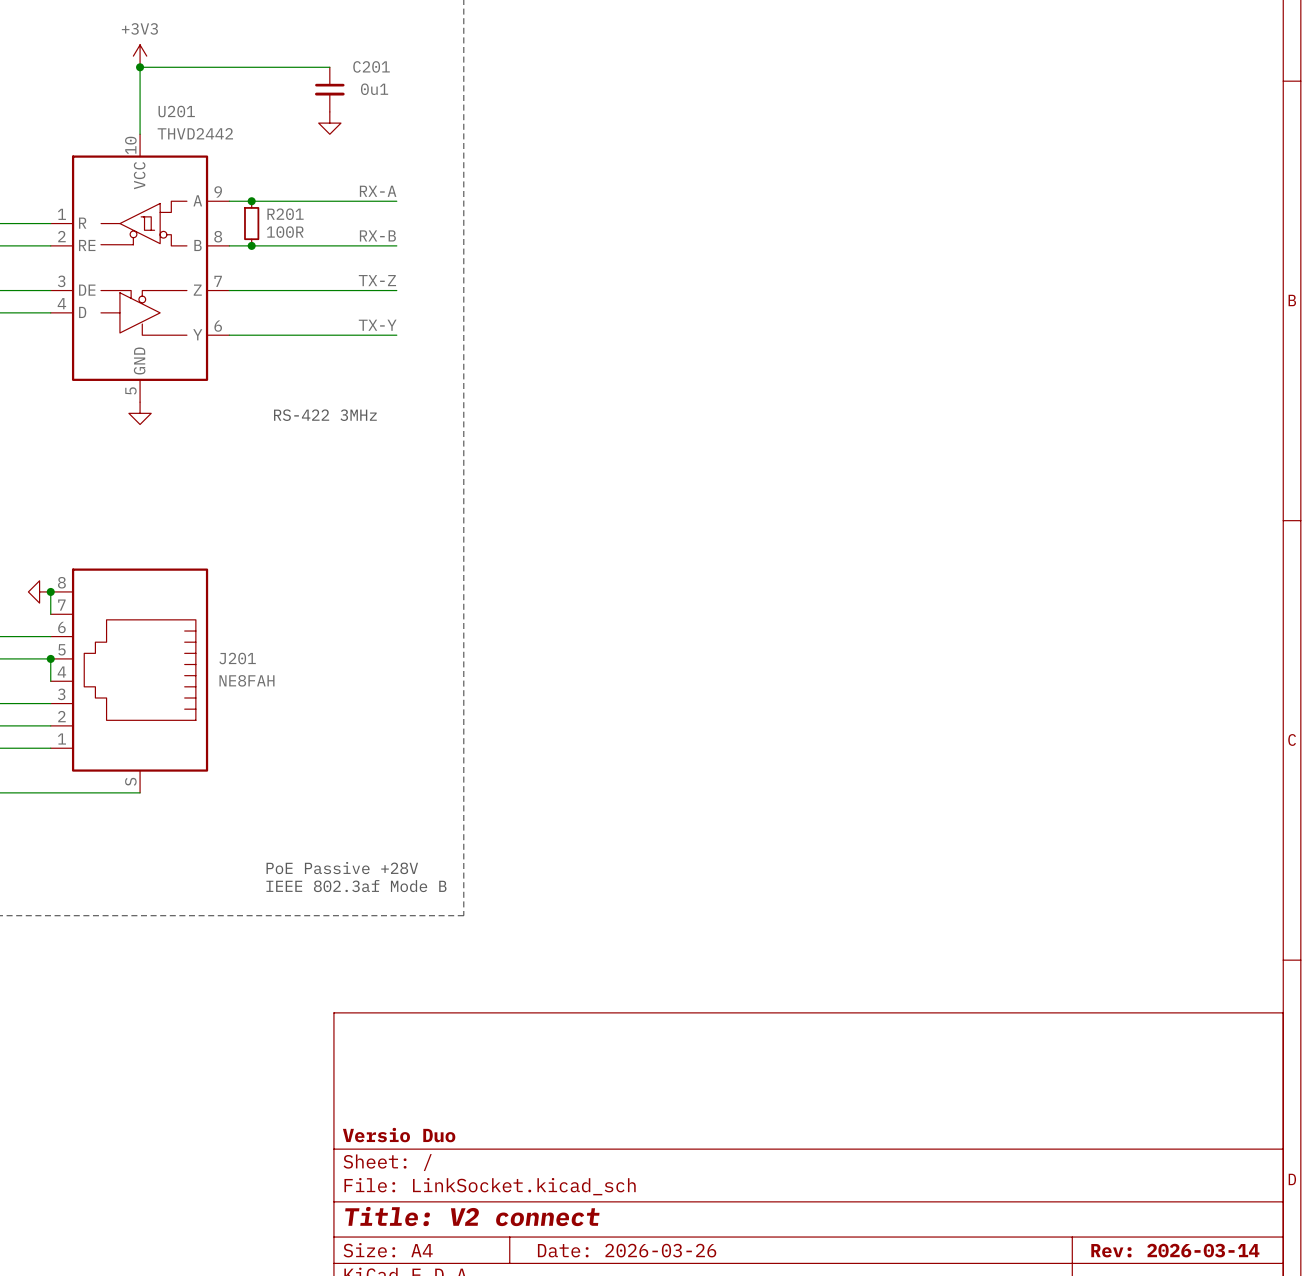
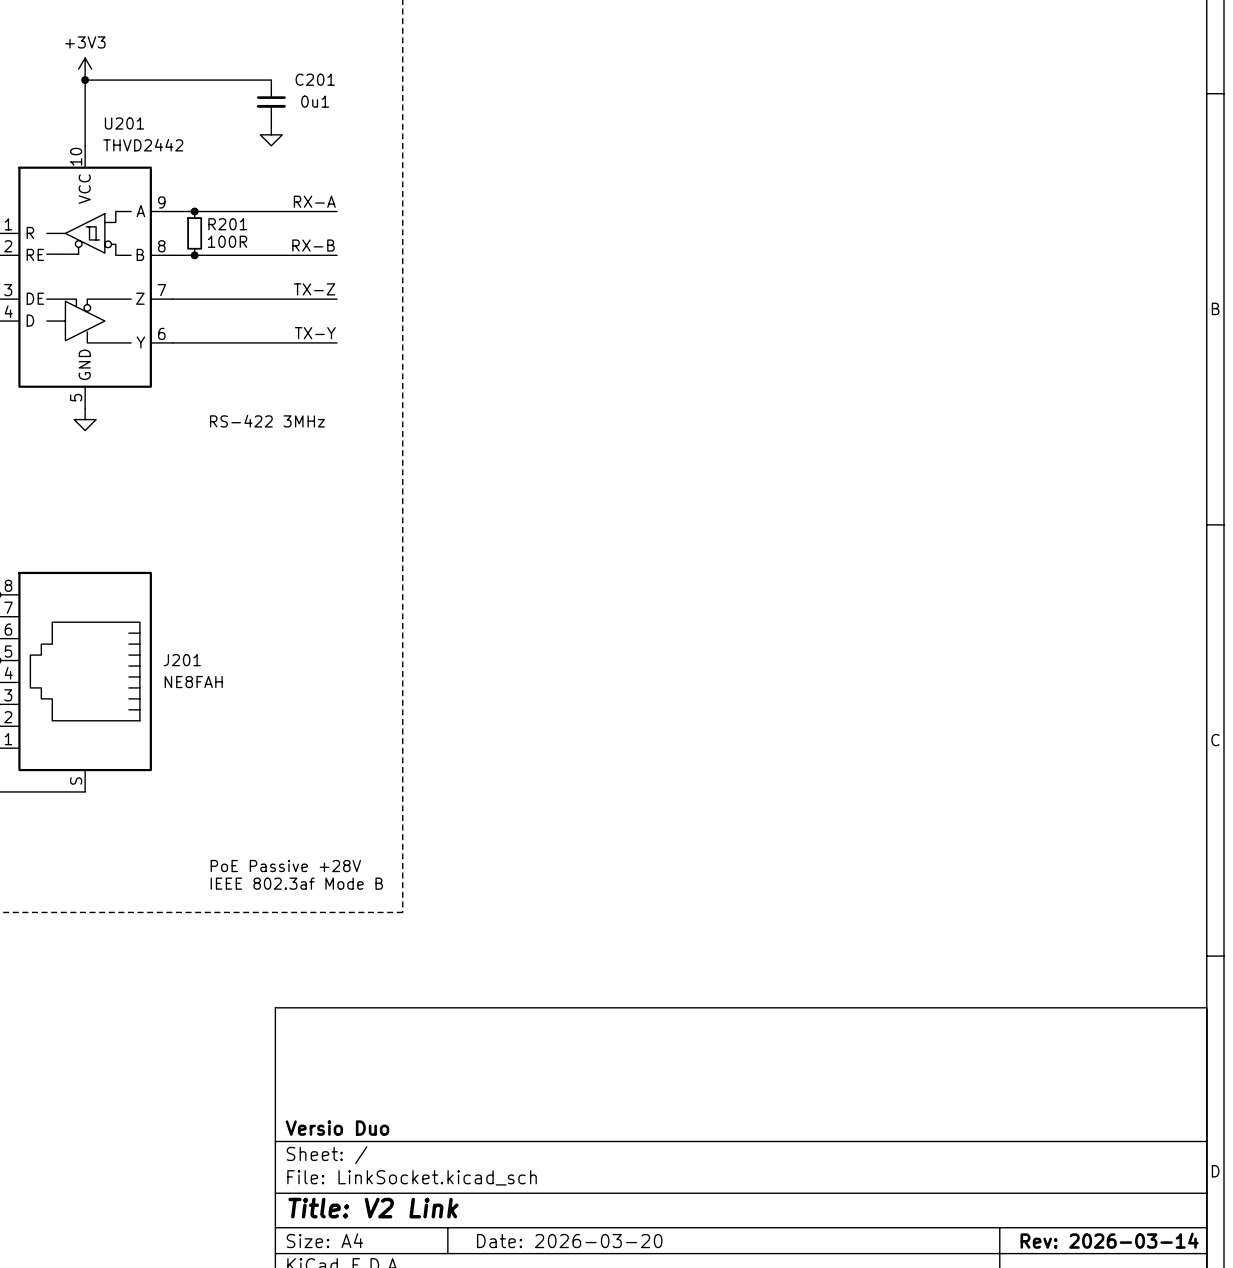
title block: Title: V2 connect (472, 1216) -> Title: V2 Link (373, 1208)
title block: Date: 2026-03-26 (627, 1250) -> Date: 2026-03-20 (569, 1241)

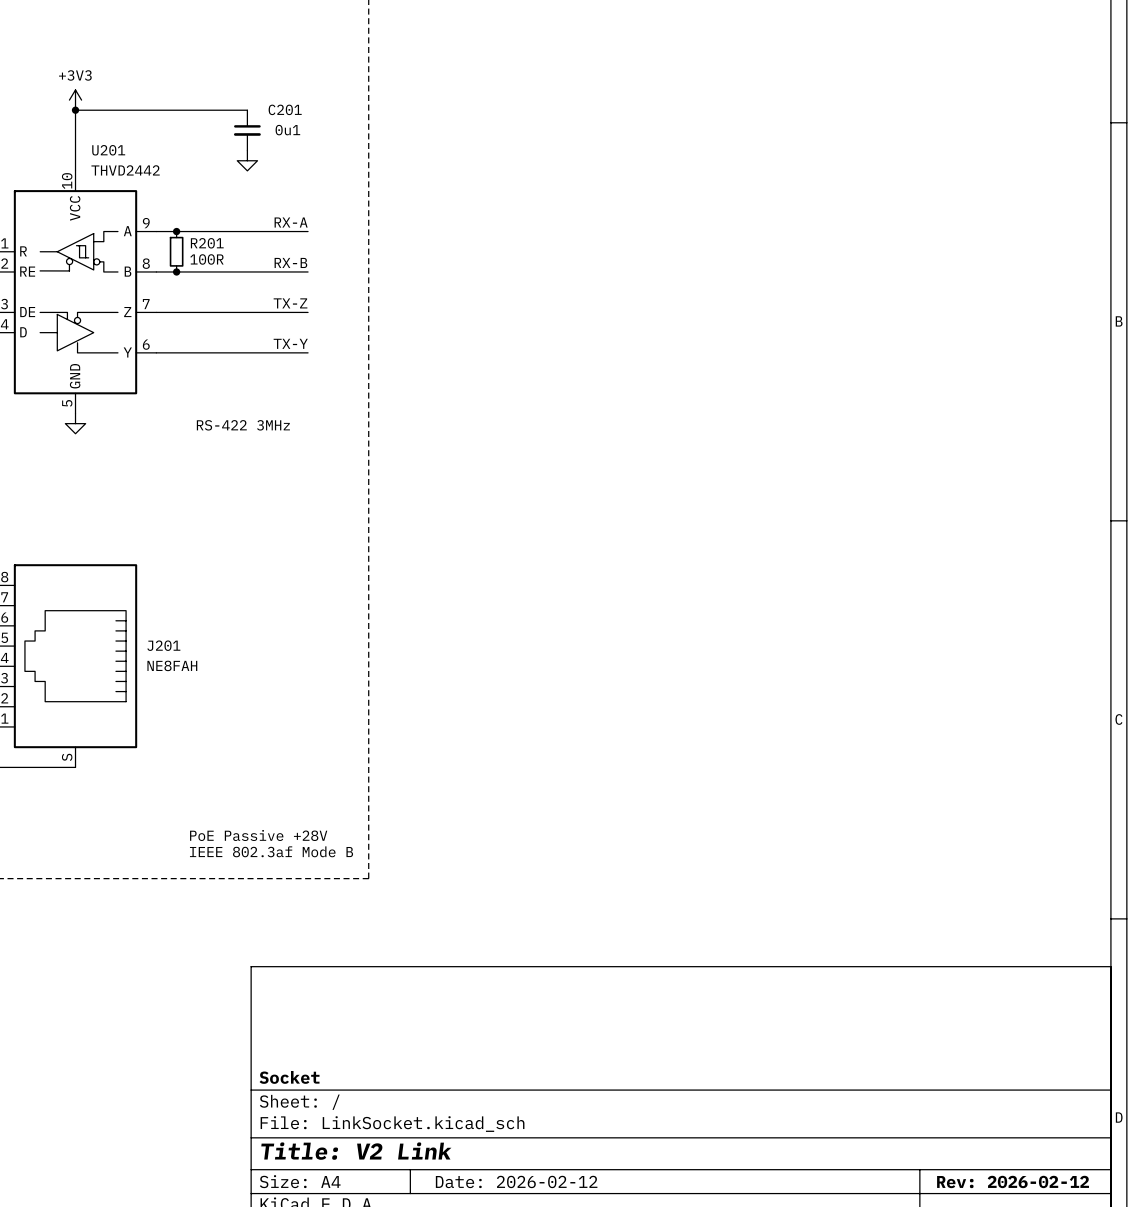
title block: Versio Duo (337, 1128) -> Socket (289, 1077)
title block: Rev: 2026-03-14 (1109, 1240) -> Rev: 2026-02-12 (1013, 1181)
title block: Date: 2026-03-20 (569, 1241) -> Date: 2026-02-12 (516, 1181)

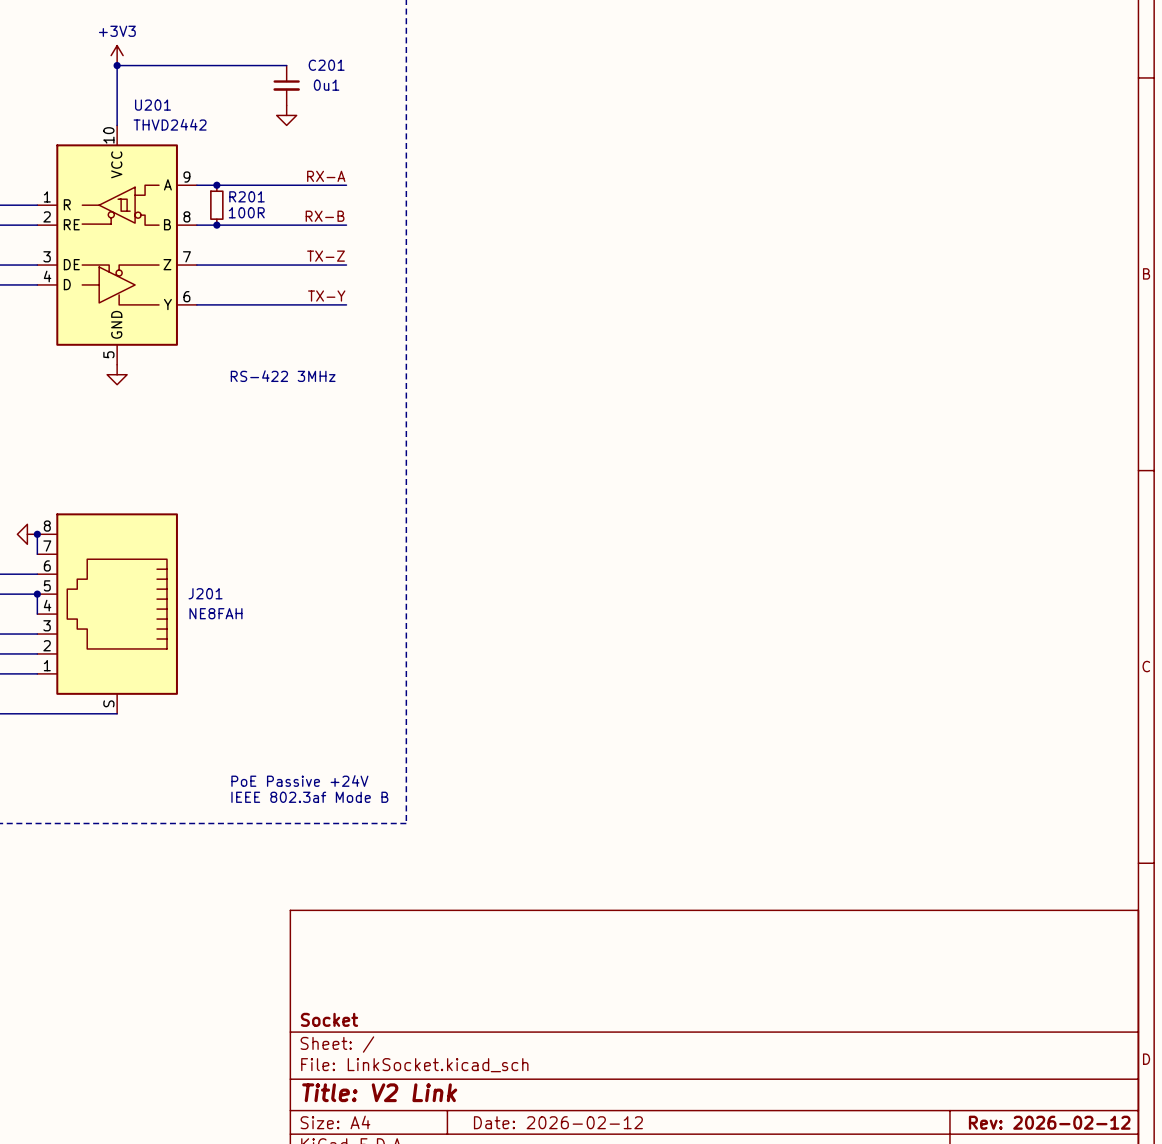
text: PoE Passive +28V (258, 835) -> PoE Passive +24V (299, 780)

